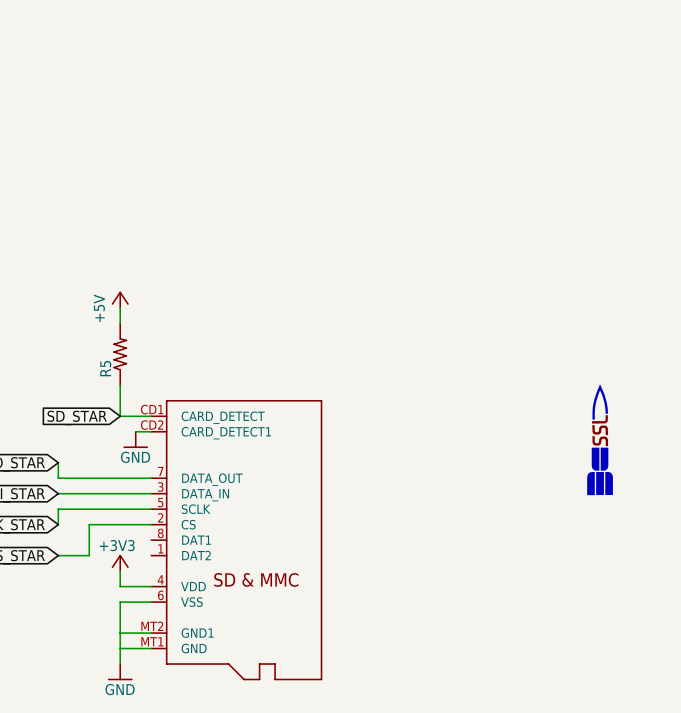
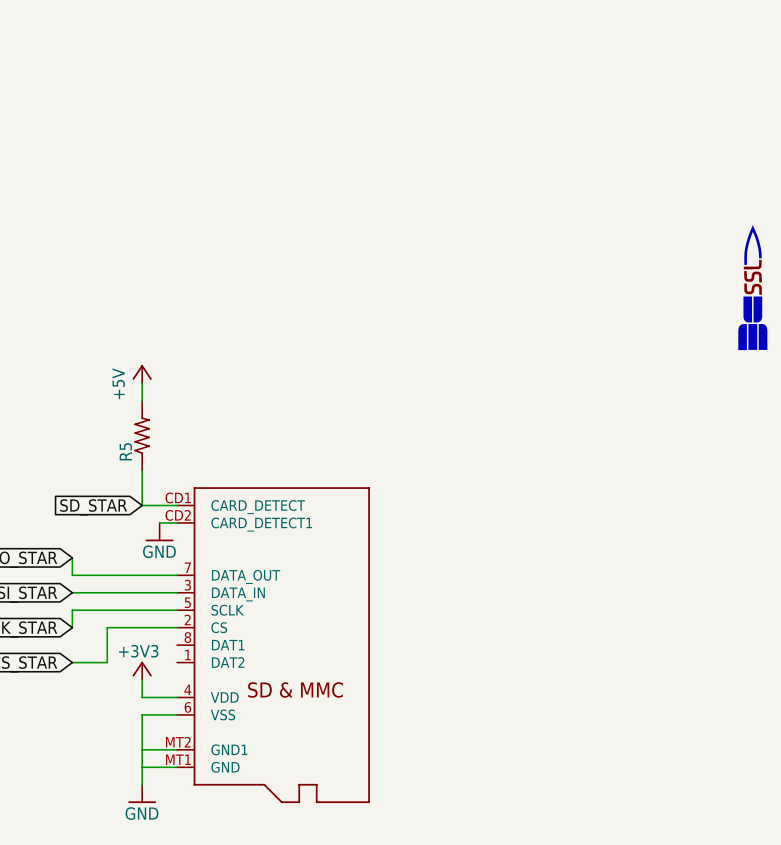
part: none -> (752, 287)
part: (600, 439) -> none

